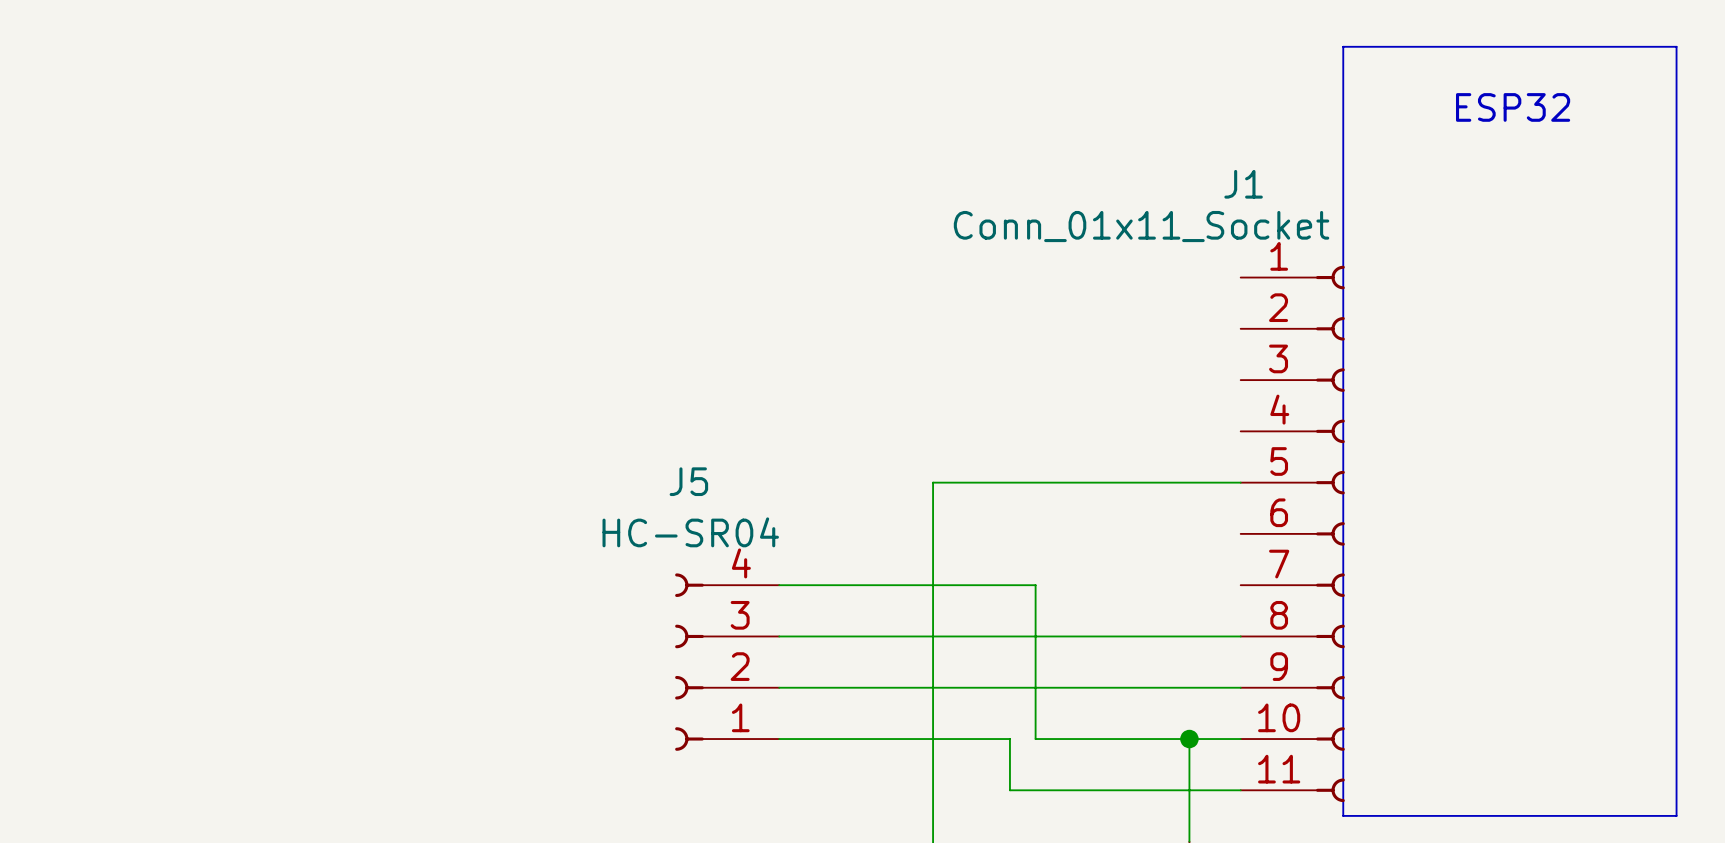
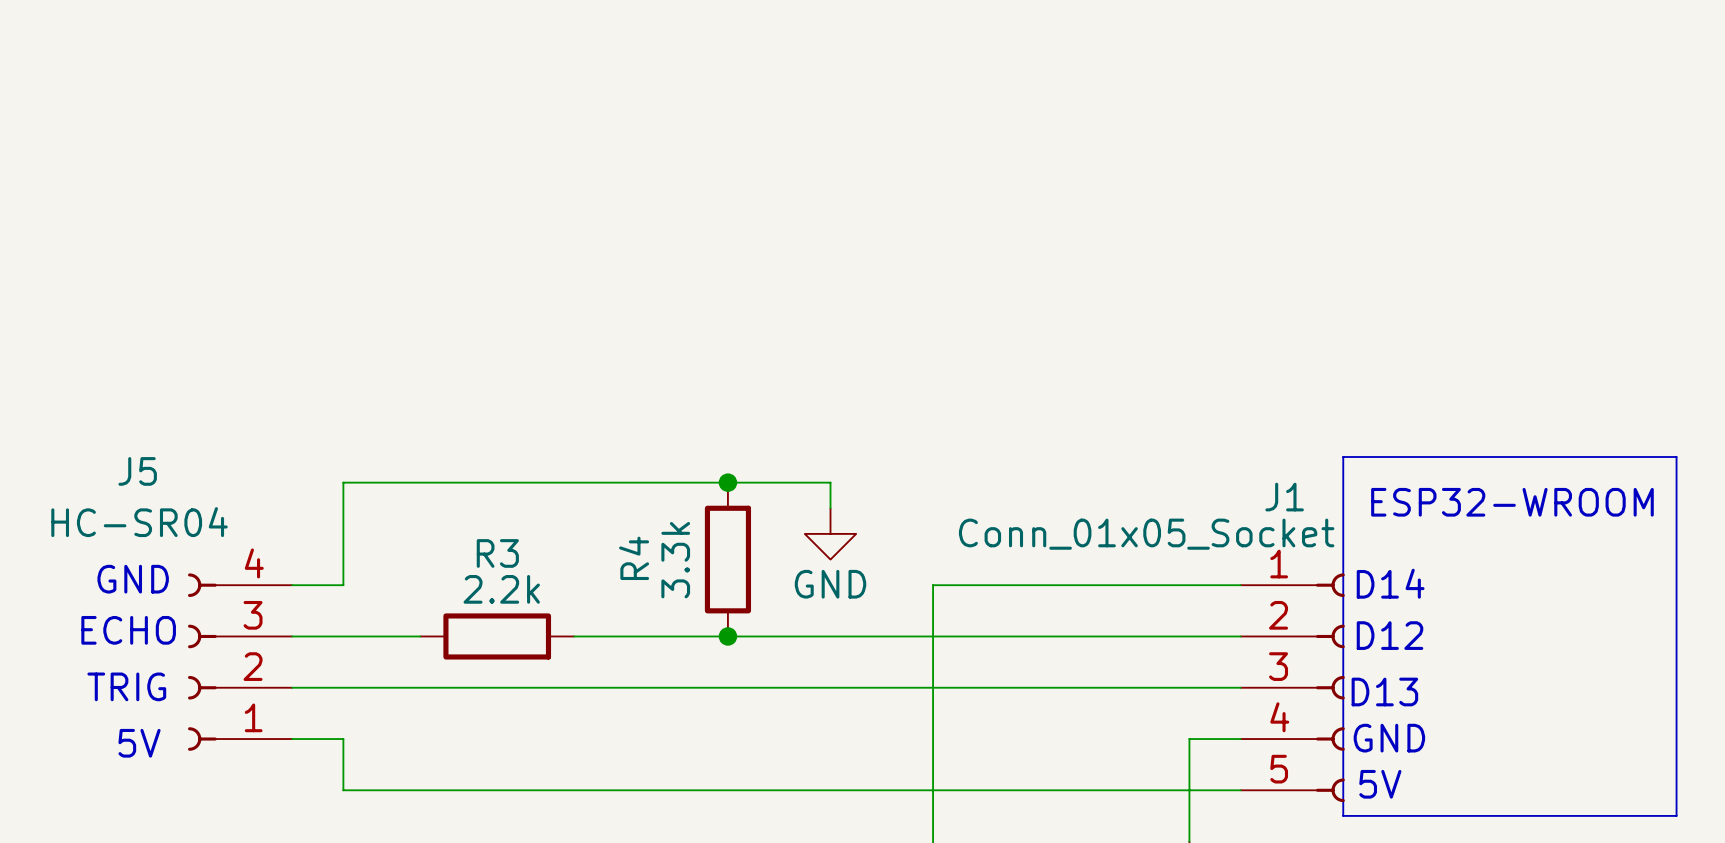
text: ESP32 (1513, 107) -> none
J1 name position: J1 (1243, 184) -> J1 (1284, 497)
J1 value: Conn_01x11_Socket (1141, 226) -> Conn_01x05_Socket (1146, 534)
J1 symbol: [1240, 265, 1345, 803] -> [1240, 573, 1345, 803]
line: (1343, 457) (1343, 46) (1676, 46) (1676, 457) -> (1343, 457) (1676, 457)
J5 name position: J5 (688, 481) -> J5 (137, 471)
junction: none -> (727, 482)
wire: (1240, 482) (933, 482) (933, 585) (779, 585) -> none
text: none -> ESP32-WROOM (1512, 502)
wire: none -> (830, 508) (830, 482) (343, 482) (343, 585) (292, 585)
J5 value position: HC-SR04 (690, 532) -> HC-SR04 (139, 522)
power symbol: none -> GND (830, 533)
R4: none -> 3.3k (727, 559)
text: none -> GND (133, 579)
text: none -> D14 (1390, 583)
wire: (1035, 585) (1035, 739) (1189, 739) -> (1035, 585) (1240, 585)
text: none -> ECHO (128, 630)
text: none -> D12 (1390, 635)
wire: none -> (292, 636) (420, 636)
R3: none -> 2.2k (497, 636)
wire: none -> (574, 636) (779, 636)
junction: none -> (727, 636)
J5 position: (727, 662) -> (240, 662)
text: none -> TRIG (126, 686)
wire: none -> (292, 687) (779, 687)
text: none -> D13 (1384, 691)
text: none -> GND (1389, 738)
wire: (779, 739) (1009, 739) (1009, 790) -> (292, 739) (343, 739) (343, 790) (1009, 790)
junction: (1189, 739) -> none
text: none -> 5V (139, 743)
text: none -> 5V (1380, 784)

